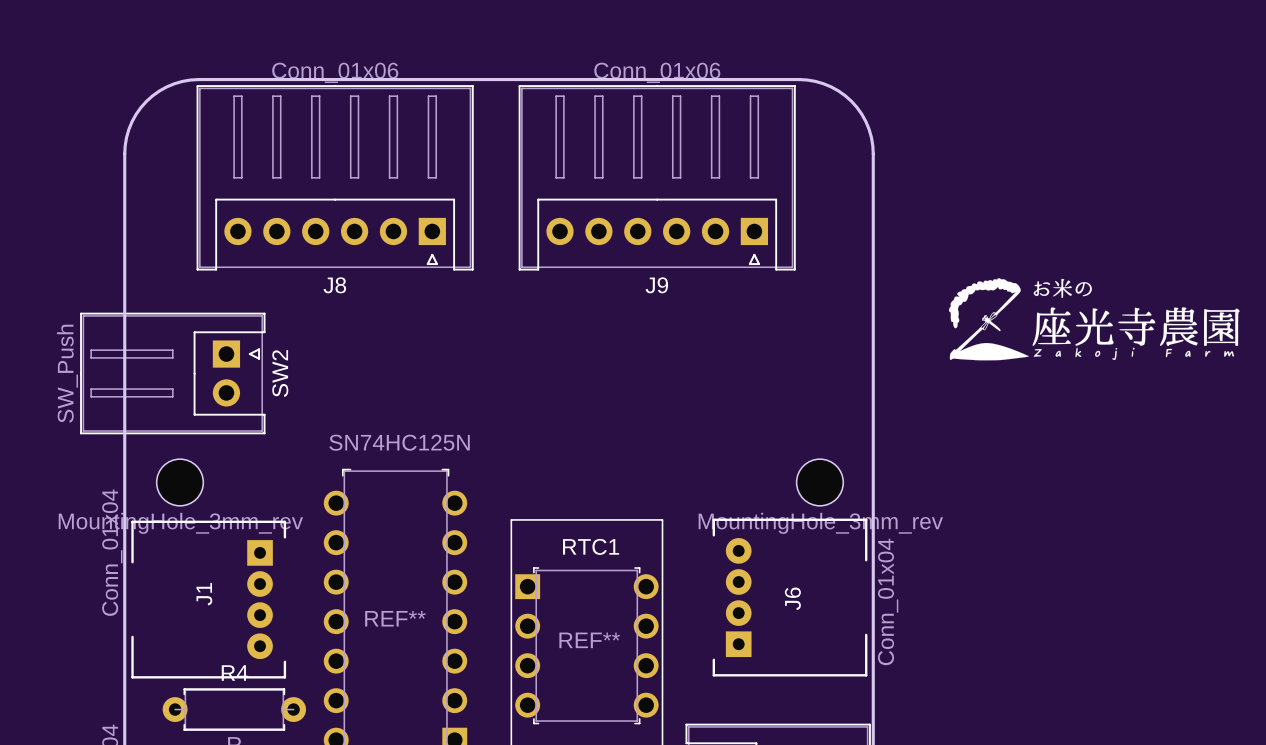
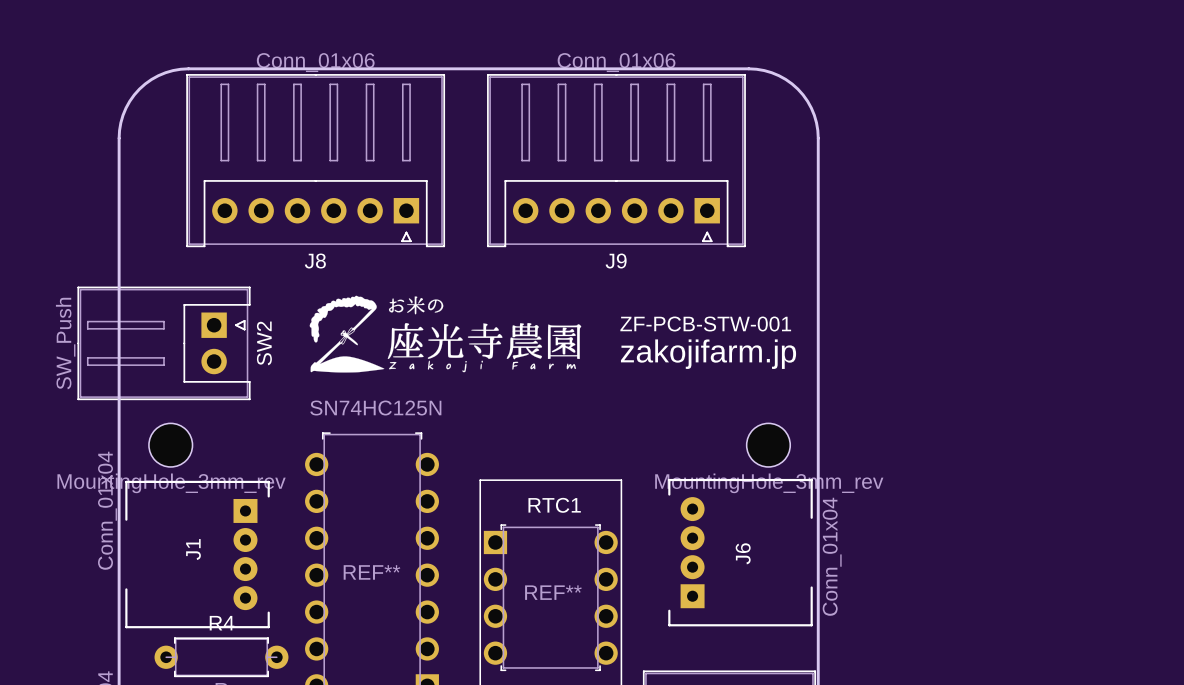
drawing: [948, 278, 1240, 361] -> none
drawing: none -> [309, 295, 582, 373]
text: none -> ZF-PCB-STW-001 (705, 324)
text: none -> zakojifarm.jp (708, 354)

